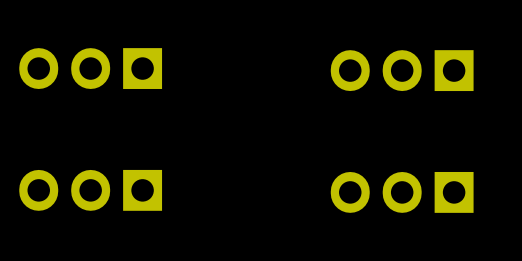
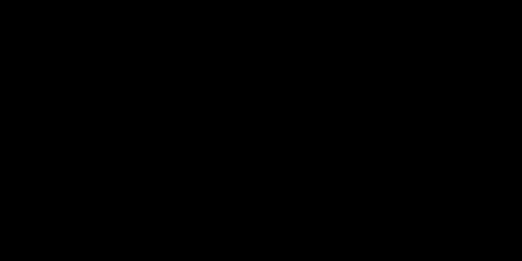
part: (90, 68) -> none
part: (402, 70) -> none
part: (90, 190) -> none
part: (402, 192) -> none

